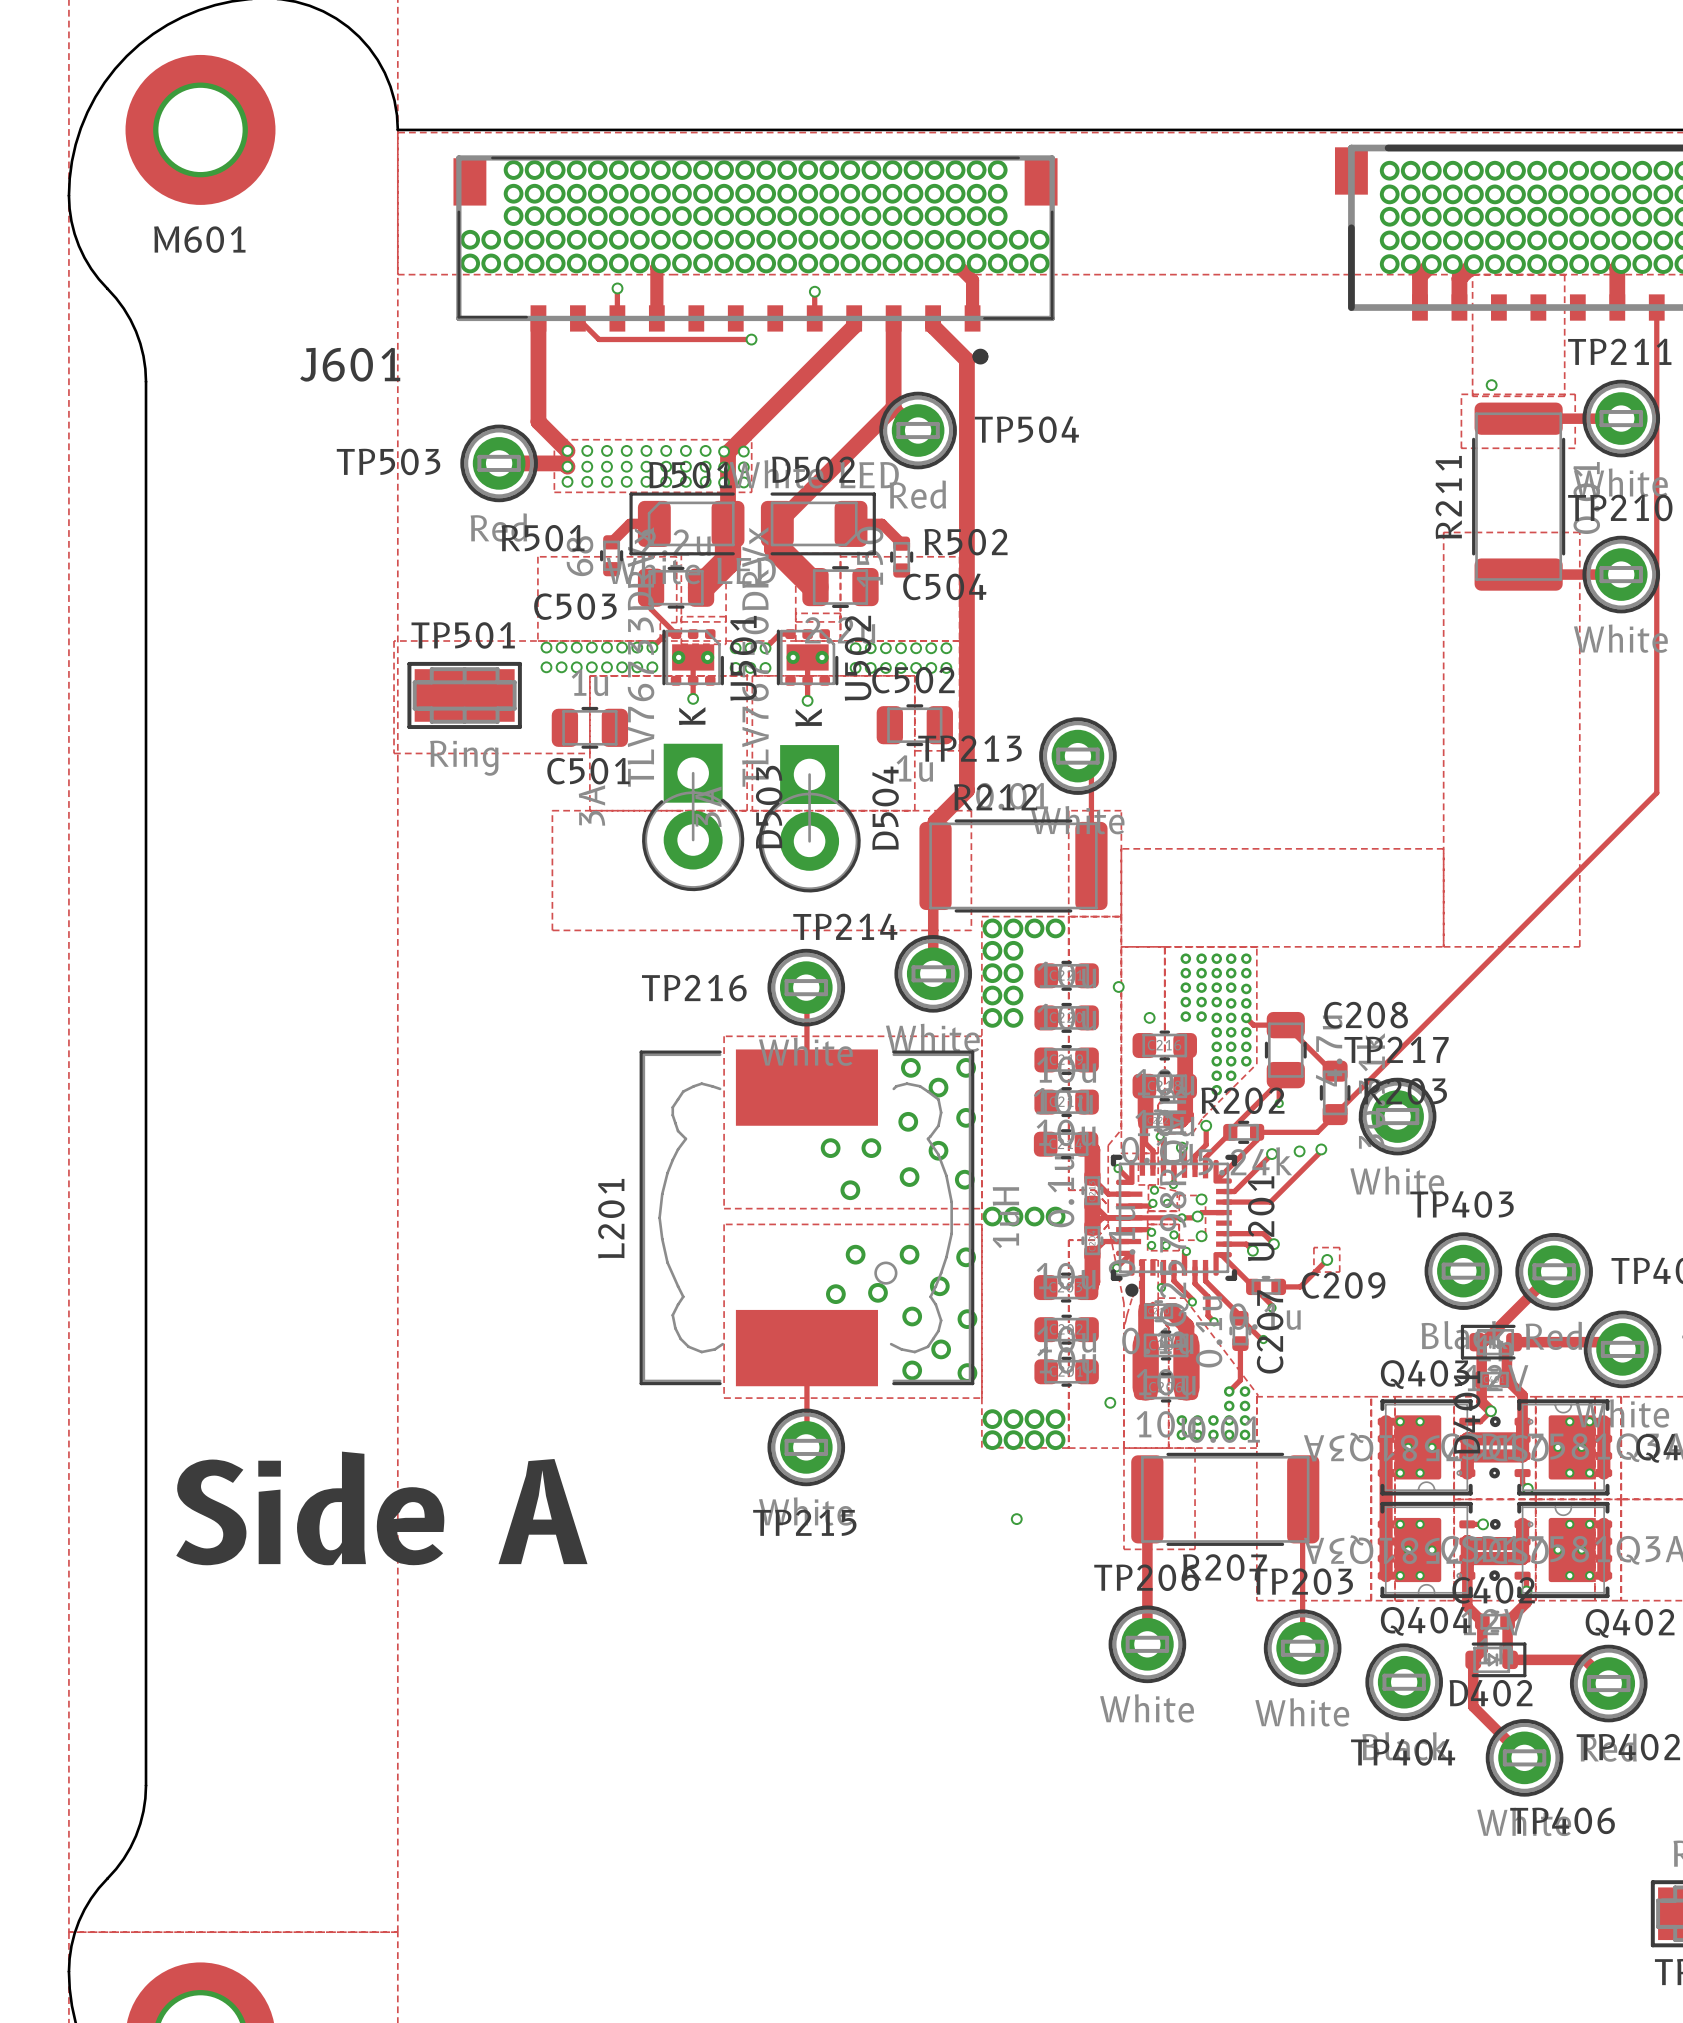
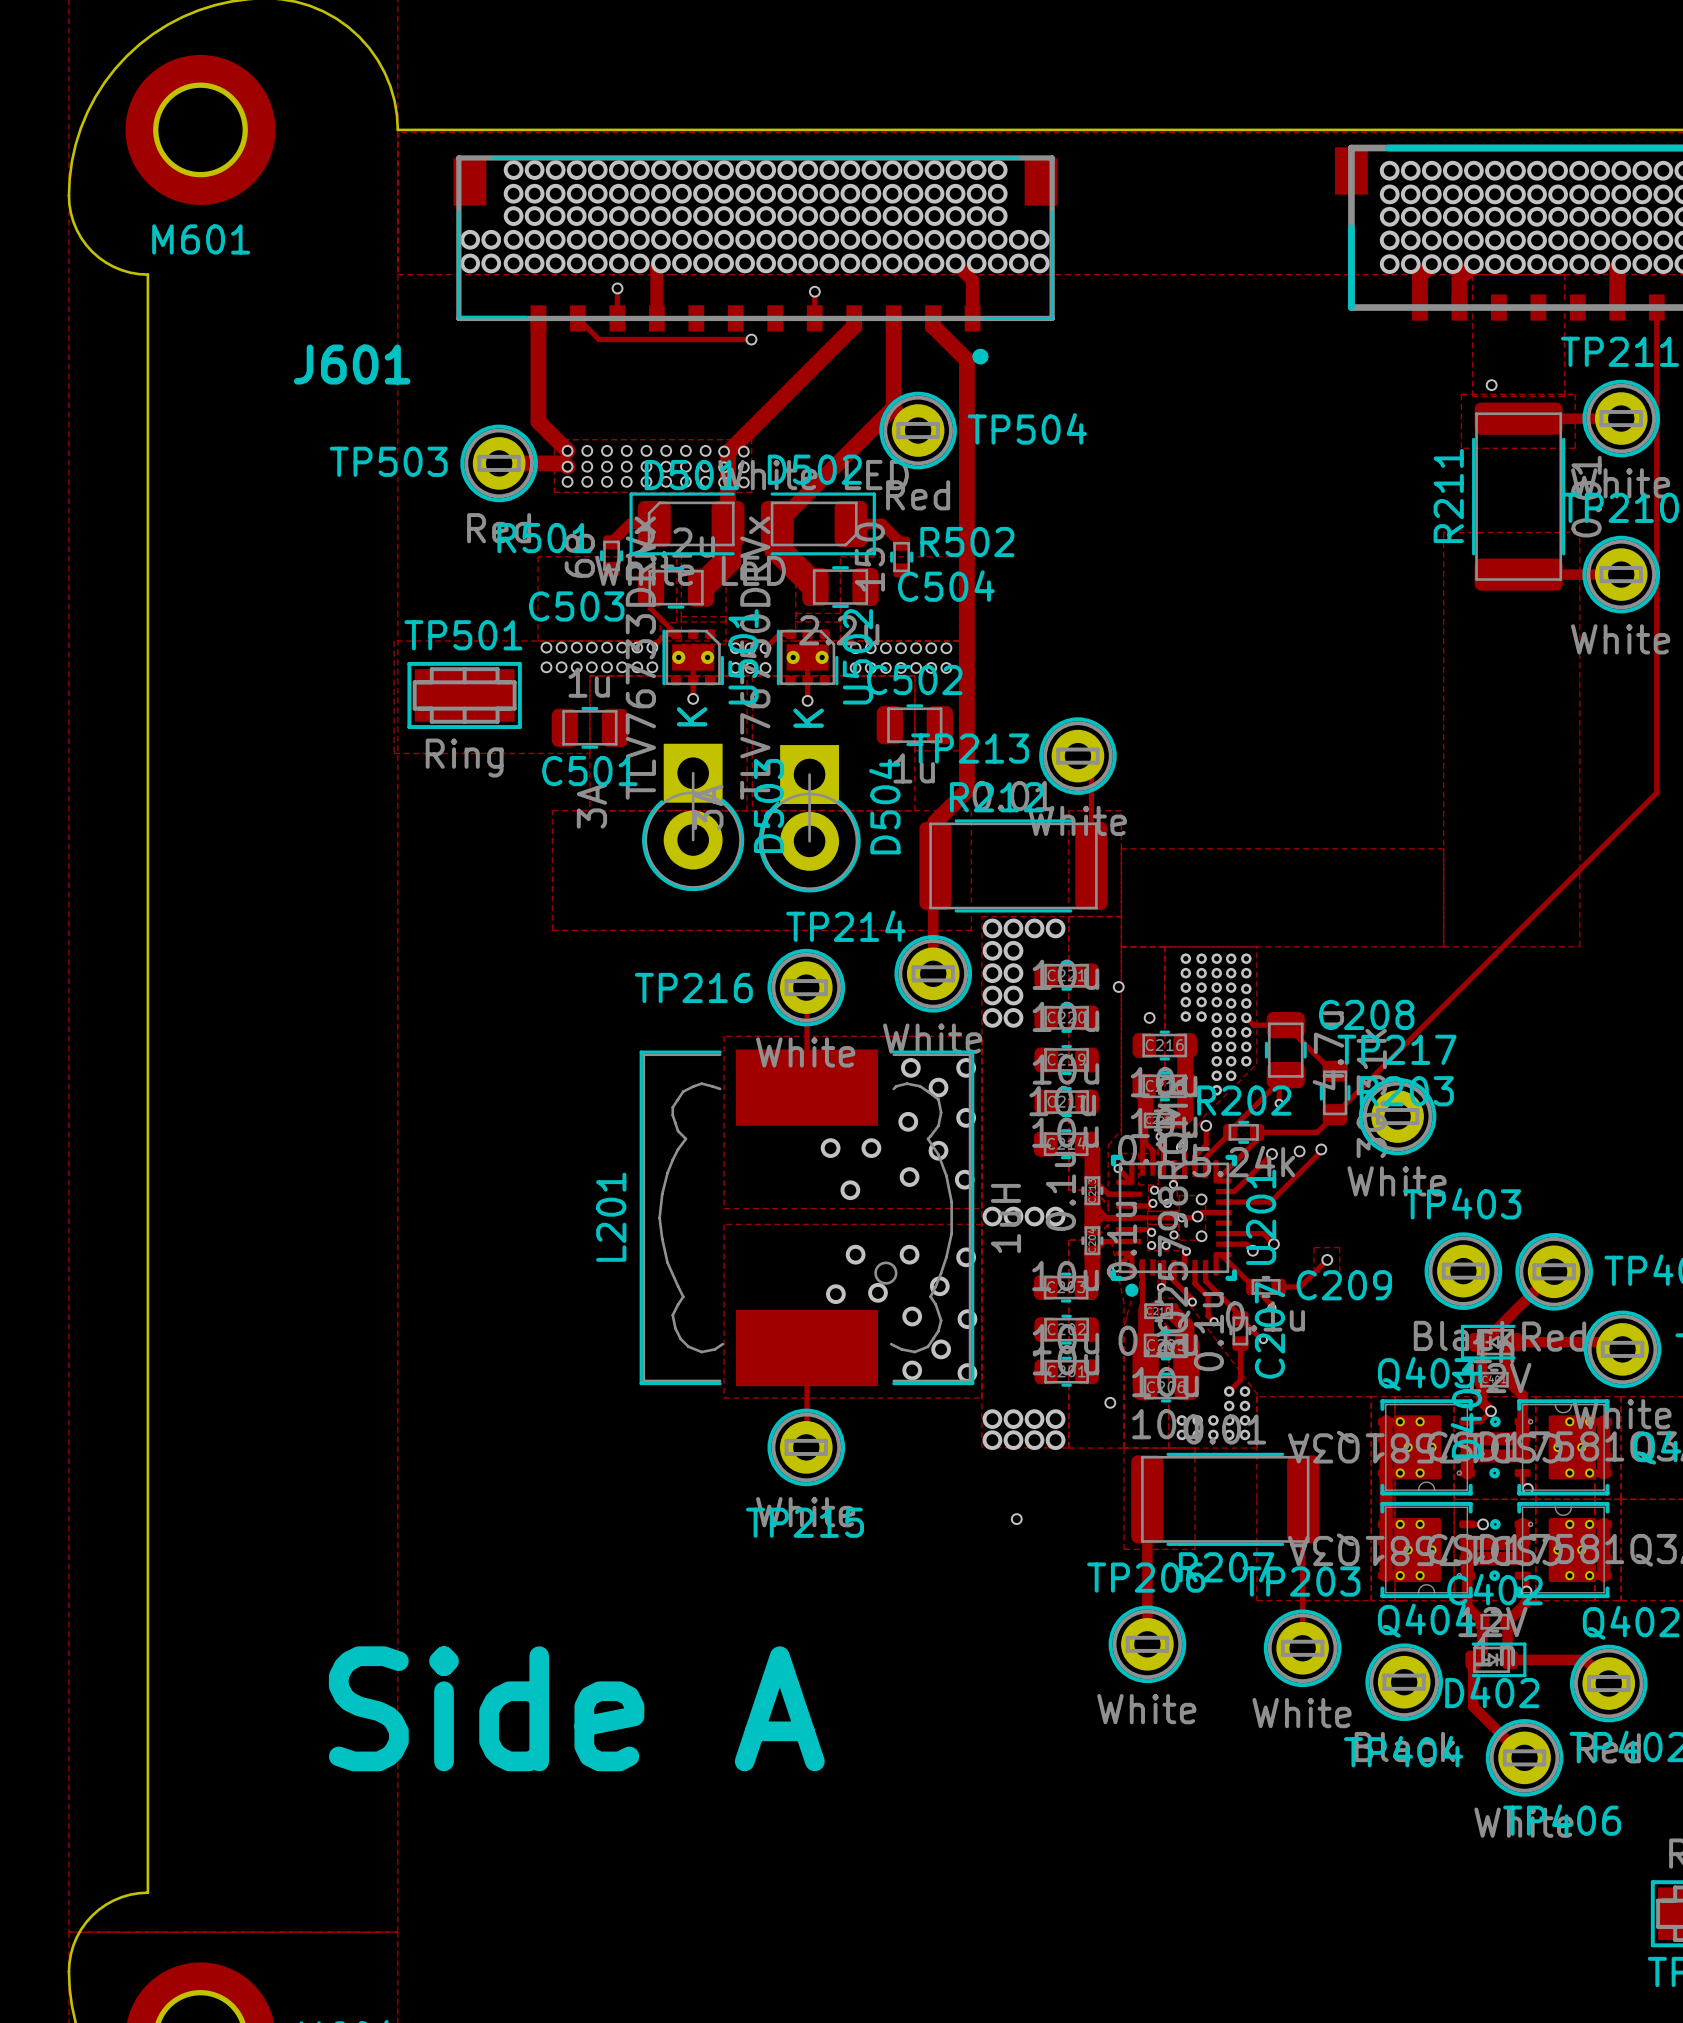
board edge: (68, 195) (71, 221) (78, 246) (91, 268) (116, 298) (130, 319) (140, 343) (146, 381) (146, 1785) (140, 1823) (130, 1847) (116, 1869) (91, 1898) (78, 1921) (71, 1945) (68, 1971) -> (68, 195) (70, 213) (76, 229) (92, 251) (113, 266) (130, 272) (147, 274) (147, 1892) (121, 1897) (105, 1904) (92, 1915) (81, 1929) (73, 1945) (68, 1971)
text position: Side A (381, 1508) -> Side A (576, 1708)

